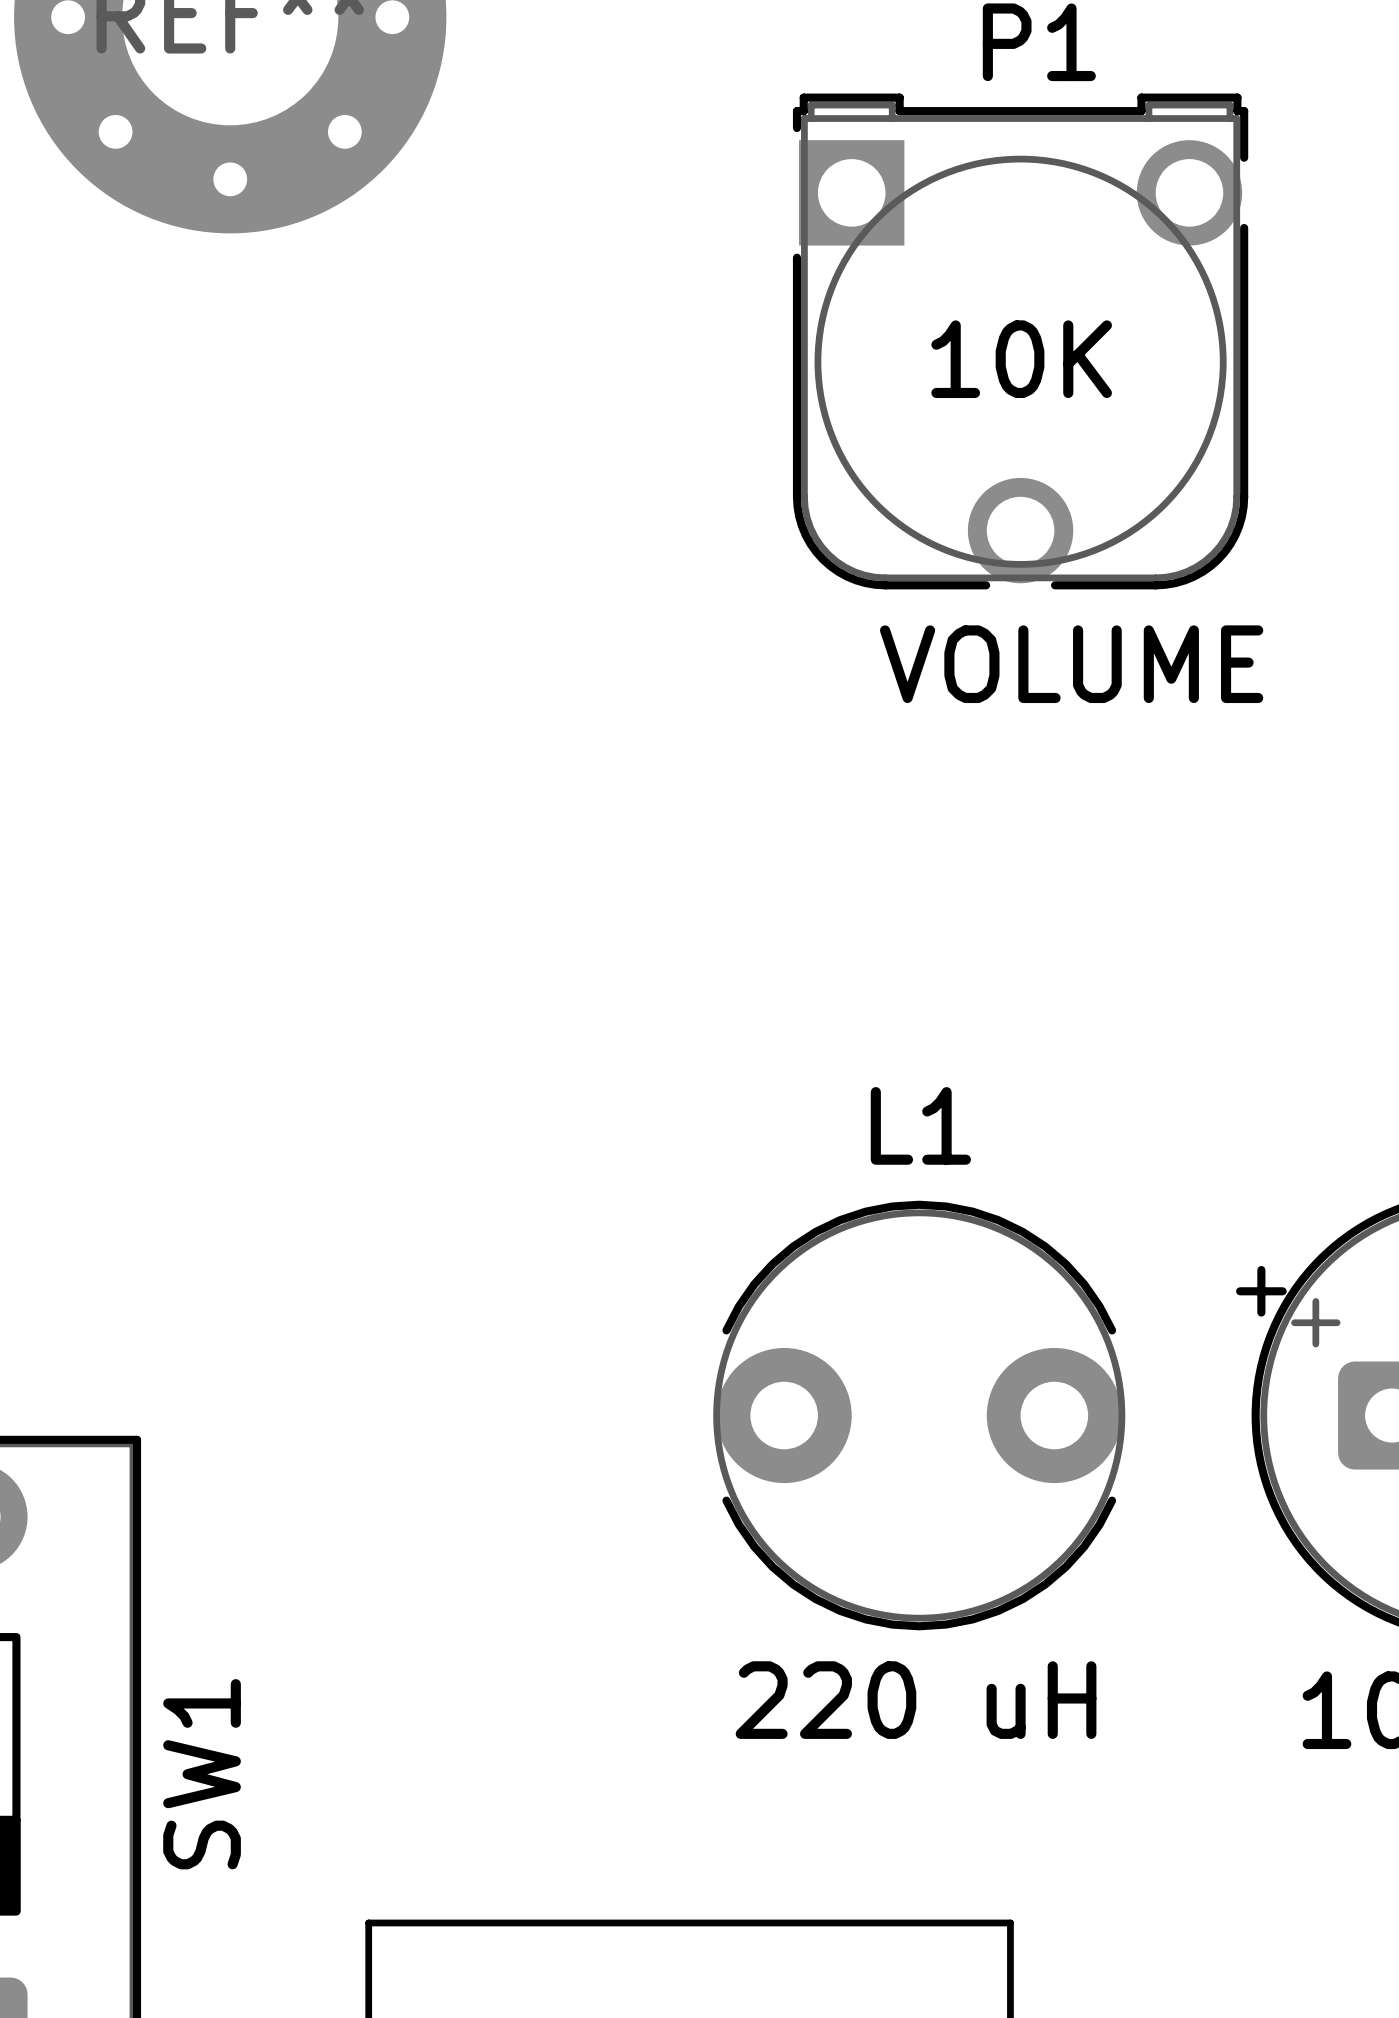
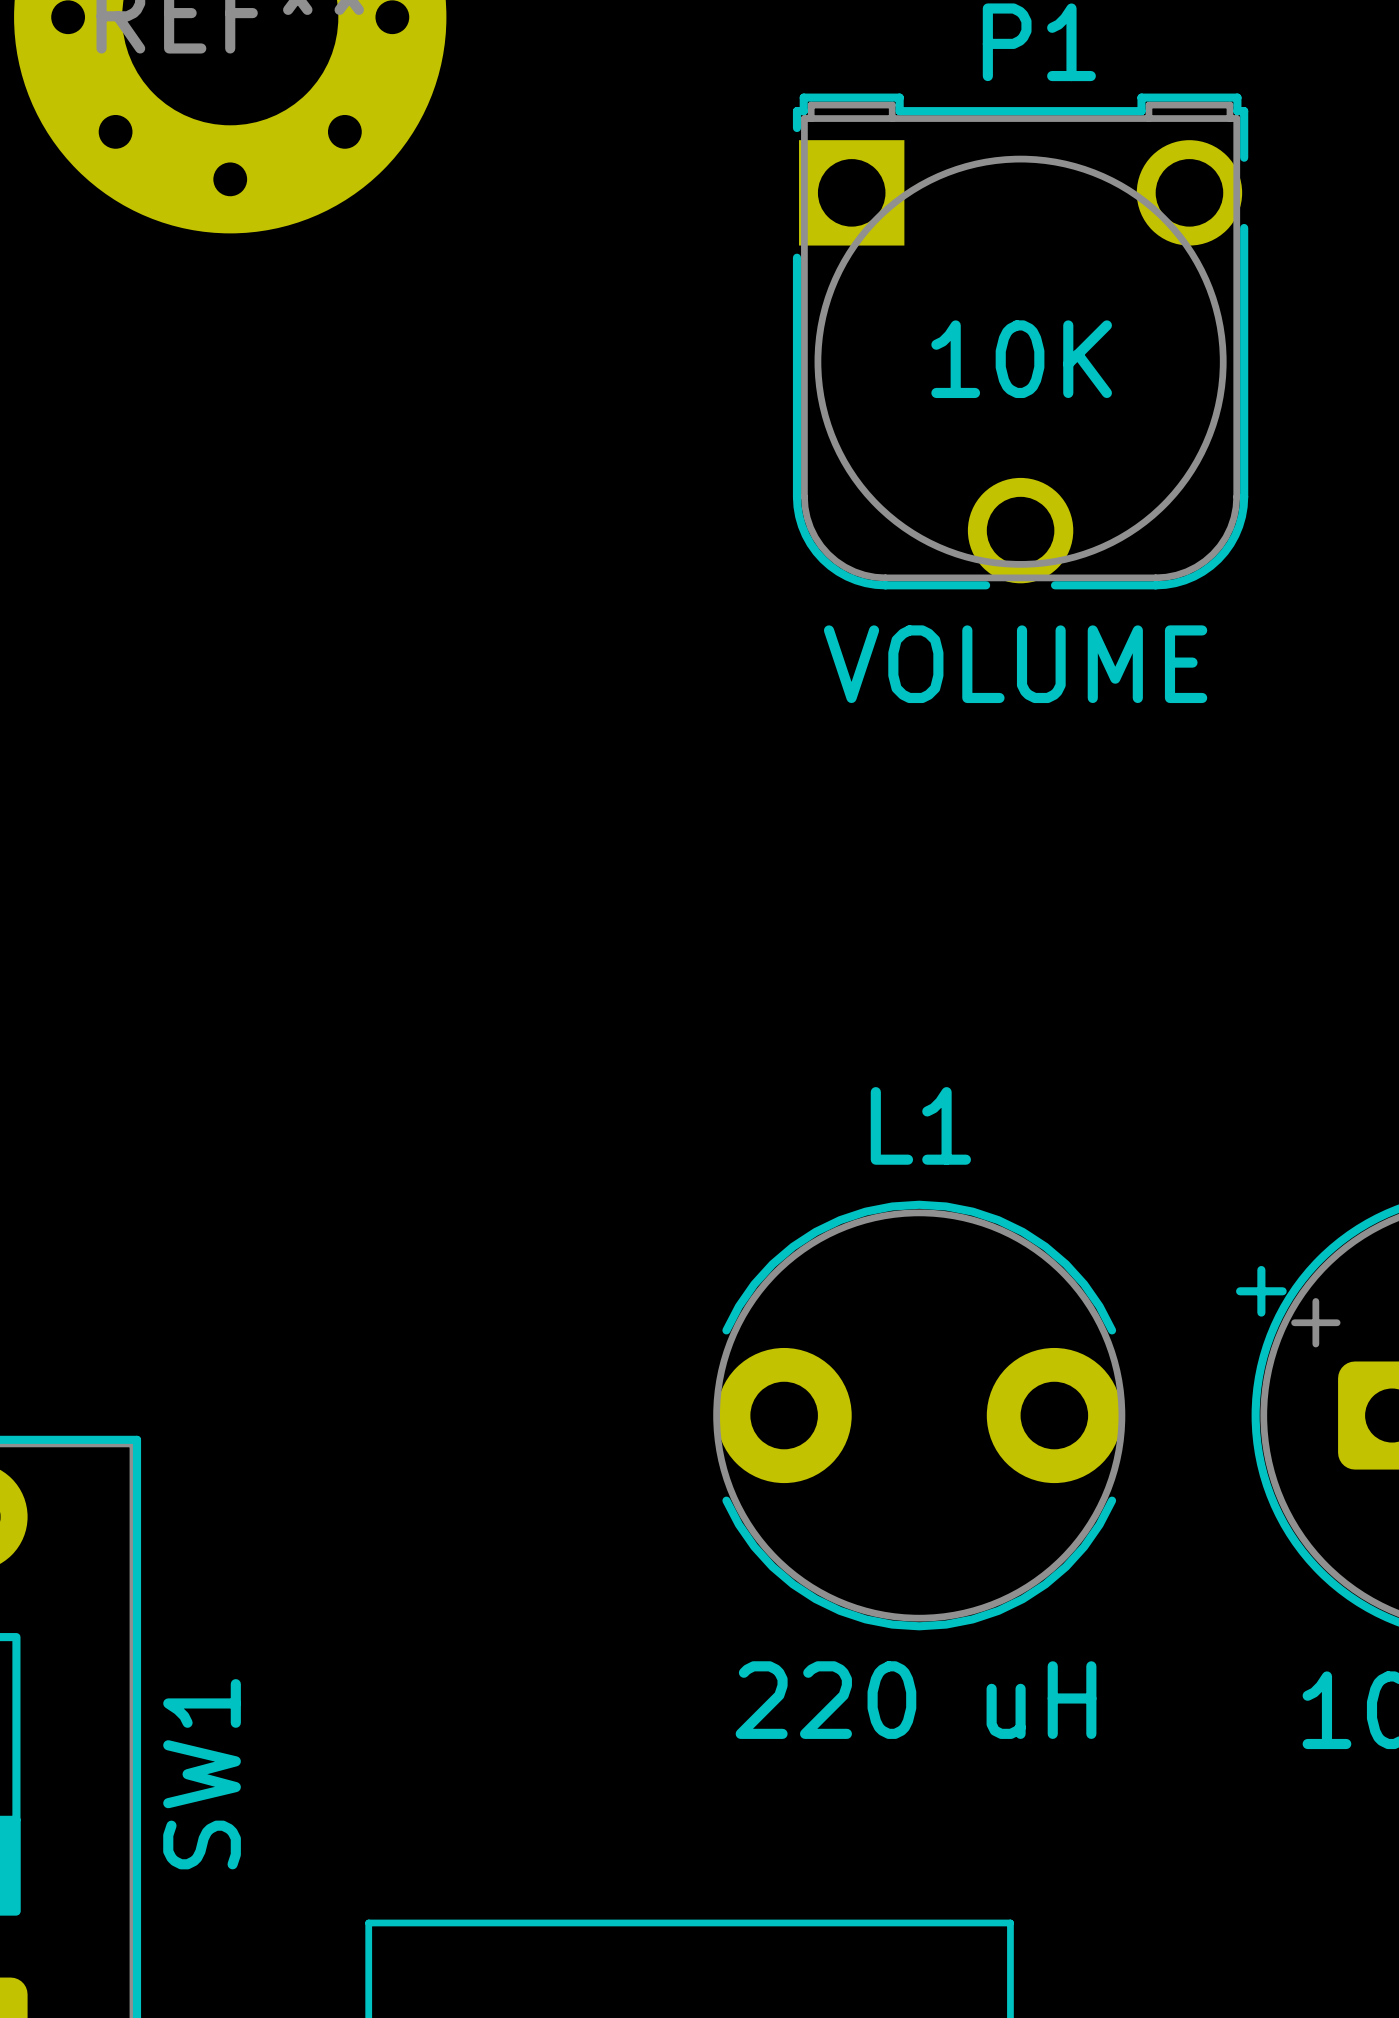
text position: VOLUME (1071, 664) -> VOLUME (1015, 664)

